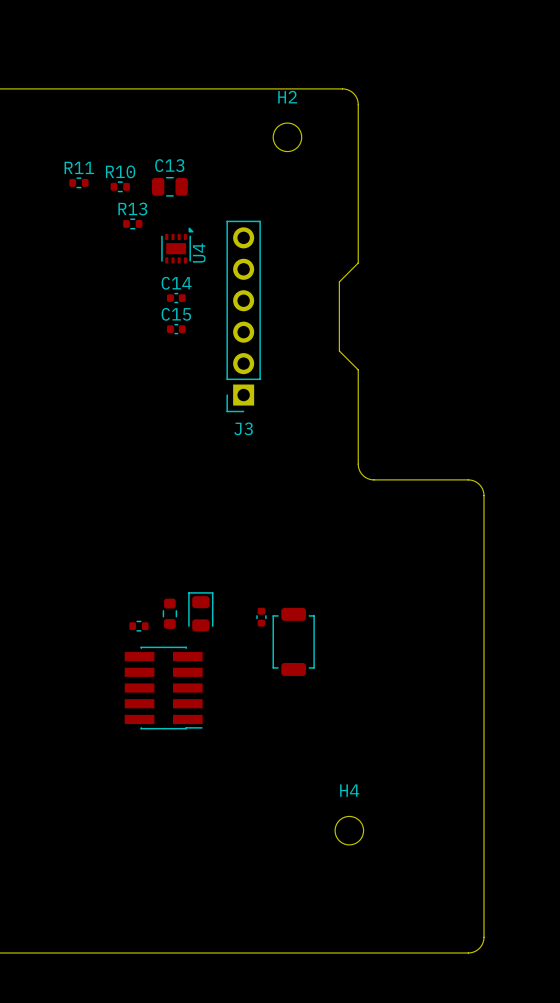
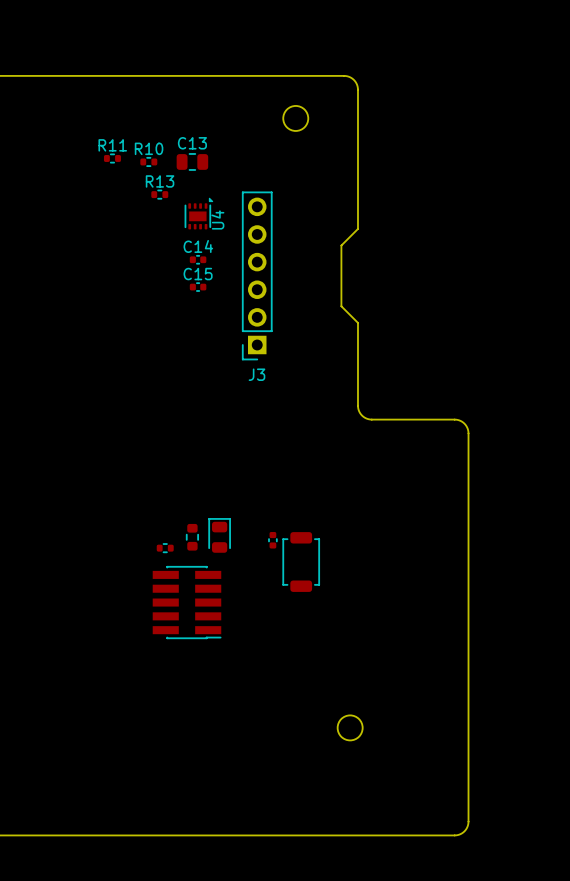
H2 name: H2 (287, 97) -> none
H4 name: H4 (349, 790) -> none

